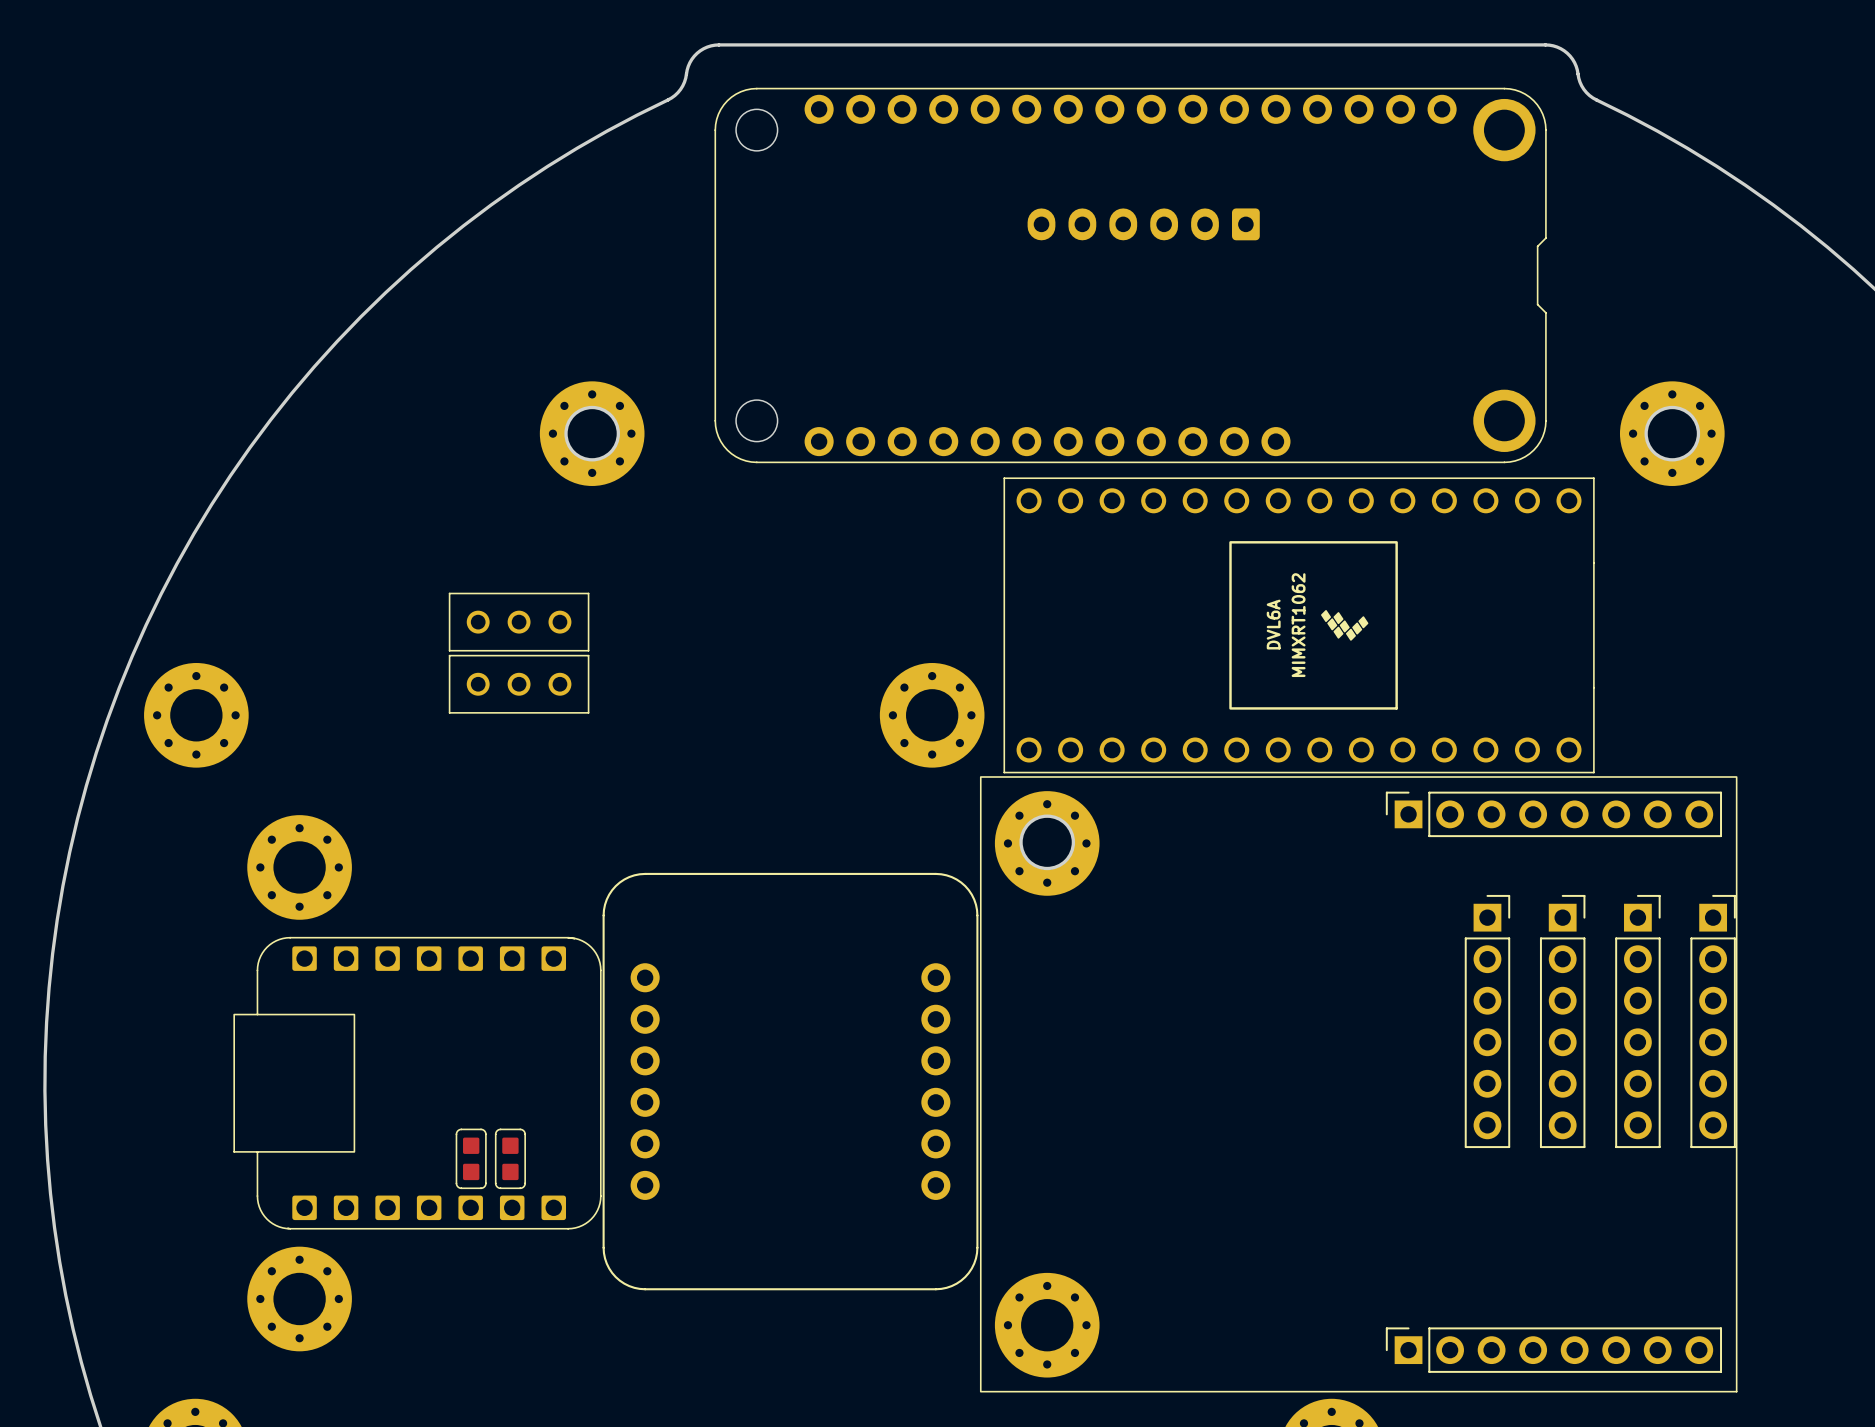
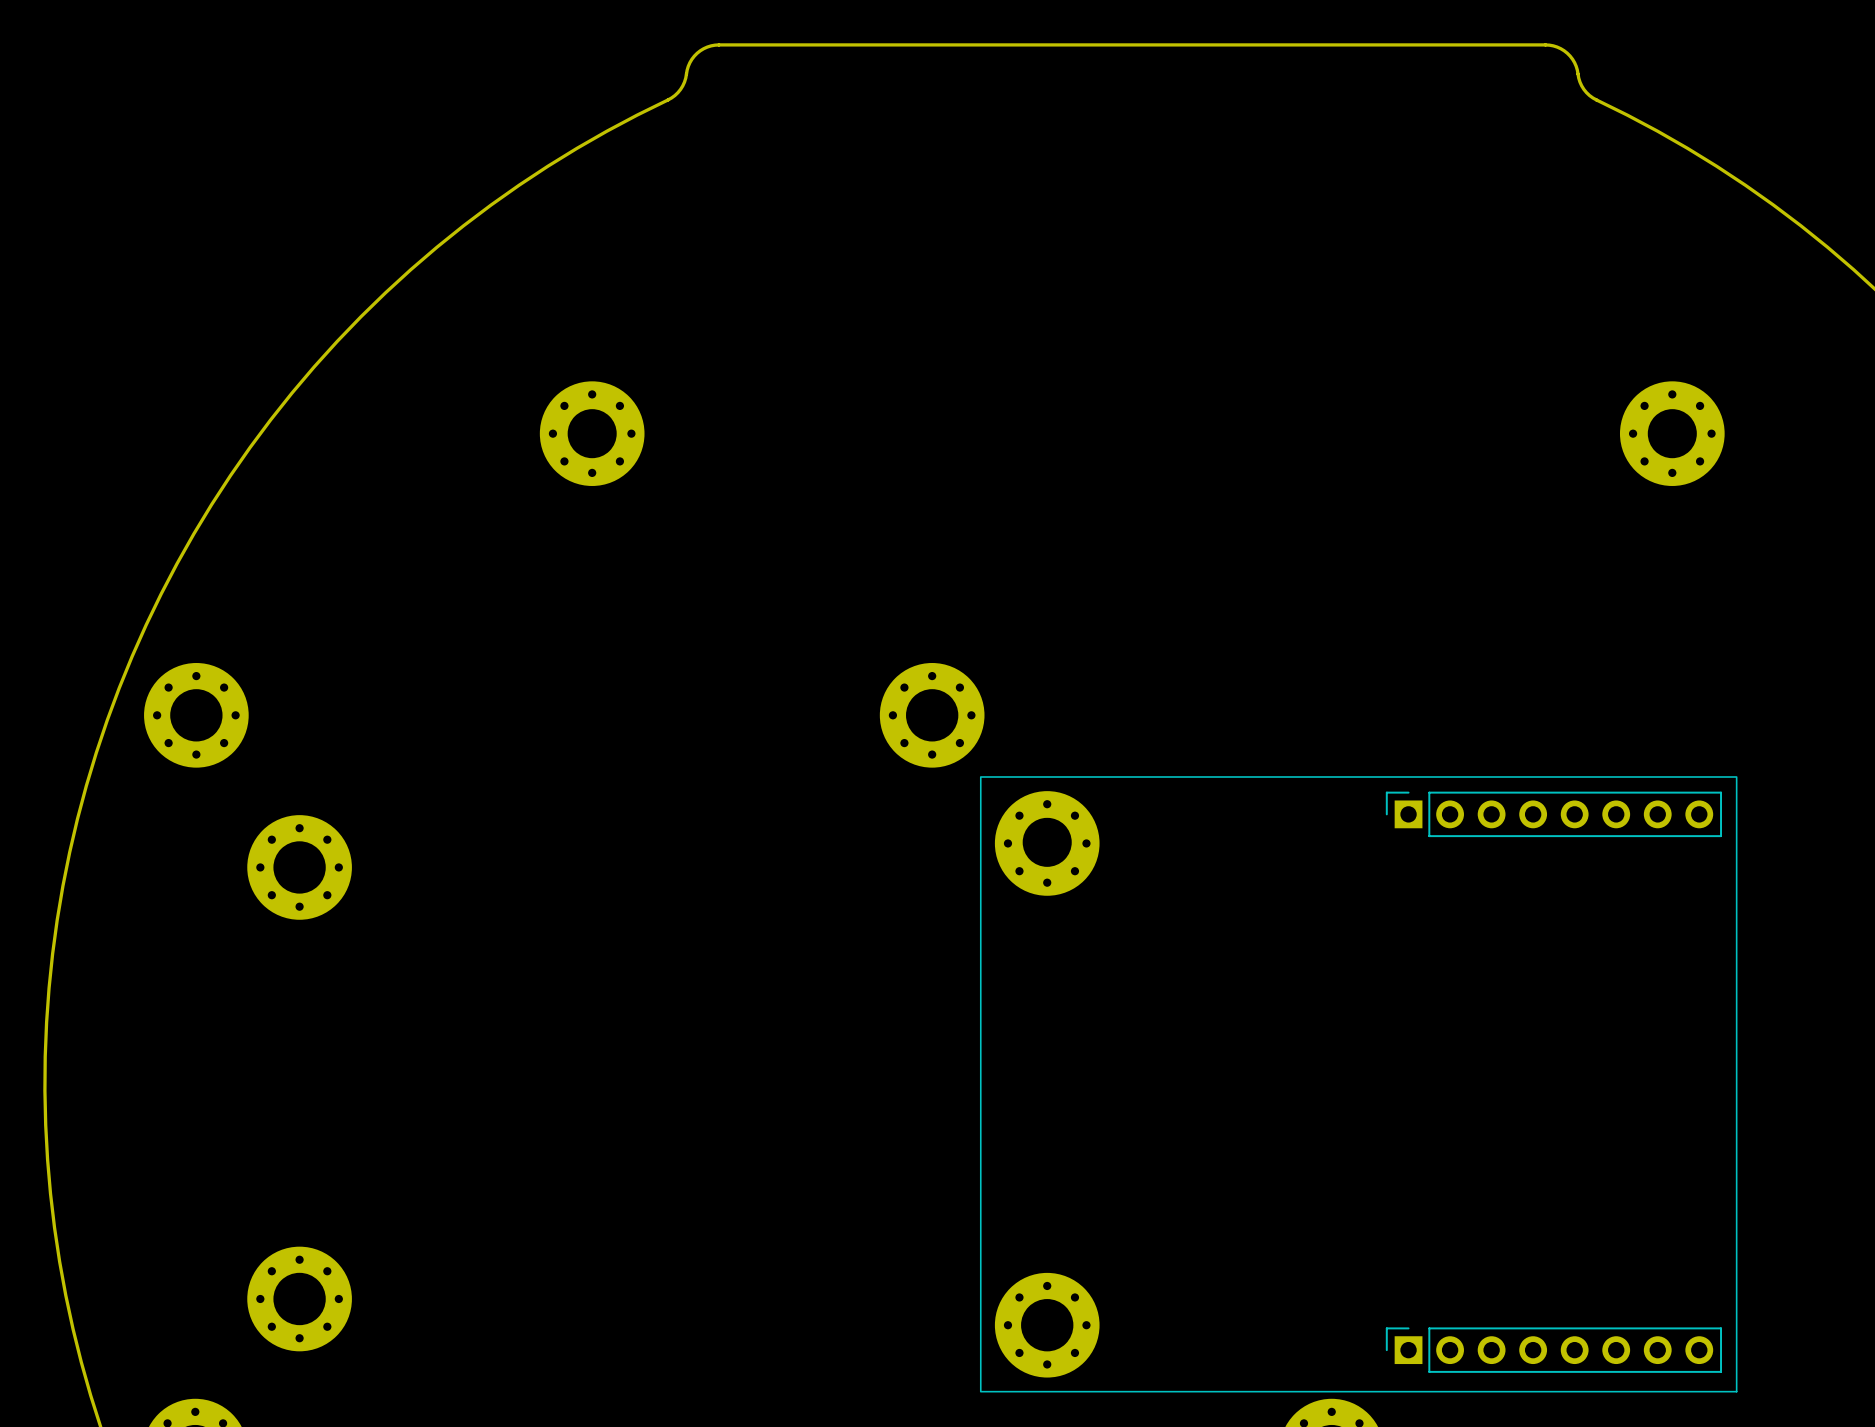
part: (1143, 224) -> none
part: (1130, 275) -> none
part: (519, 622) -> none
part: (1299, 625) -> none
part: (519, 684) -> none
part: (1487, 1021) -> none
part: (1562, 1021) -> none
part: (1637, 1021) -> none
part: (1713, 1021) -> none
part: (790, 1081) -> none
part: (417, 1083) -> none
part: (471, 1158) -> none
part: (510, 1158) -> none

